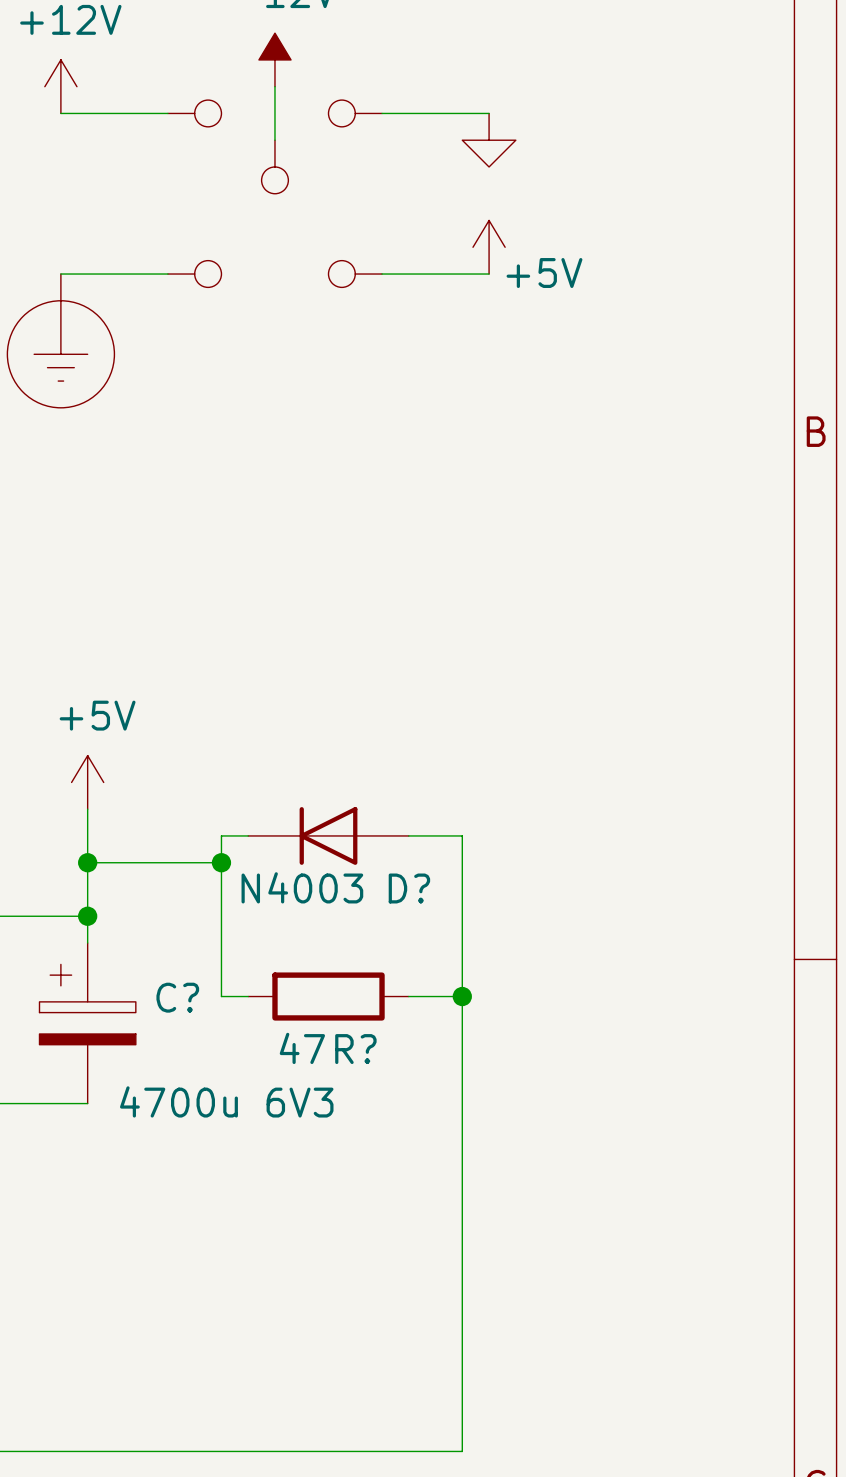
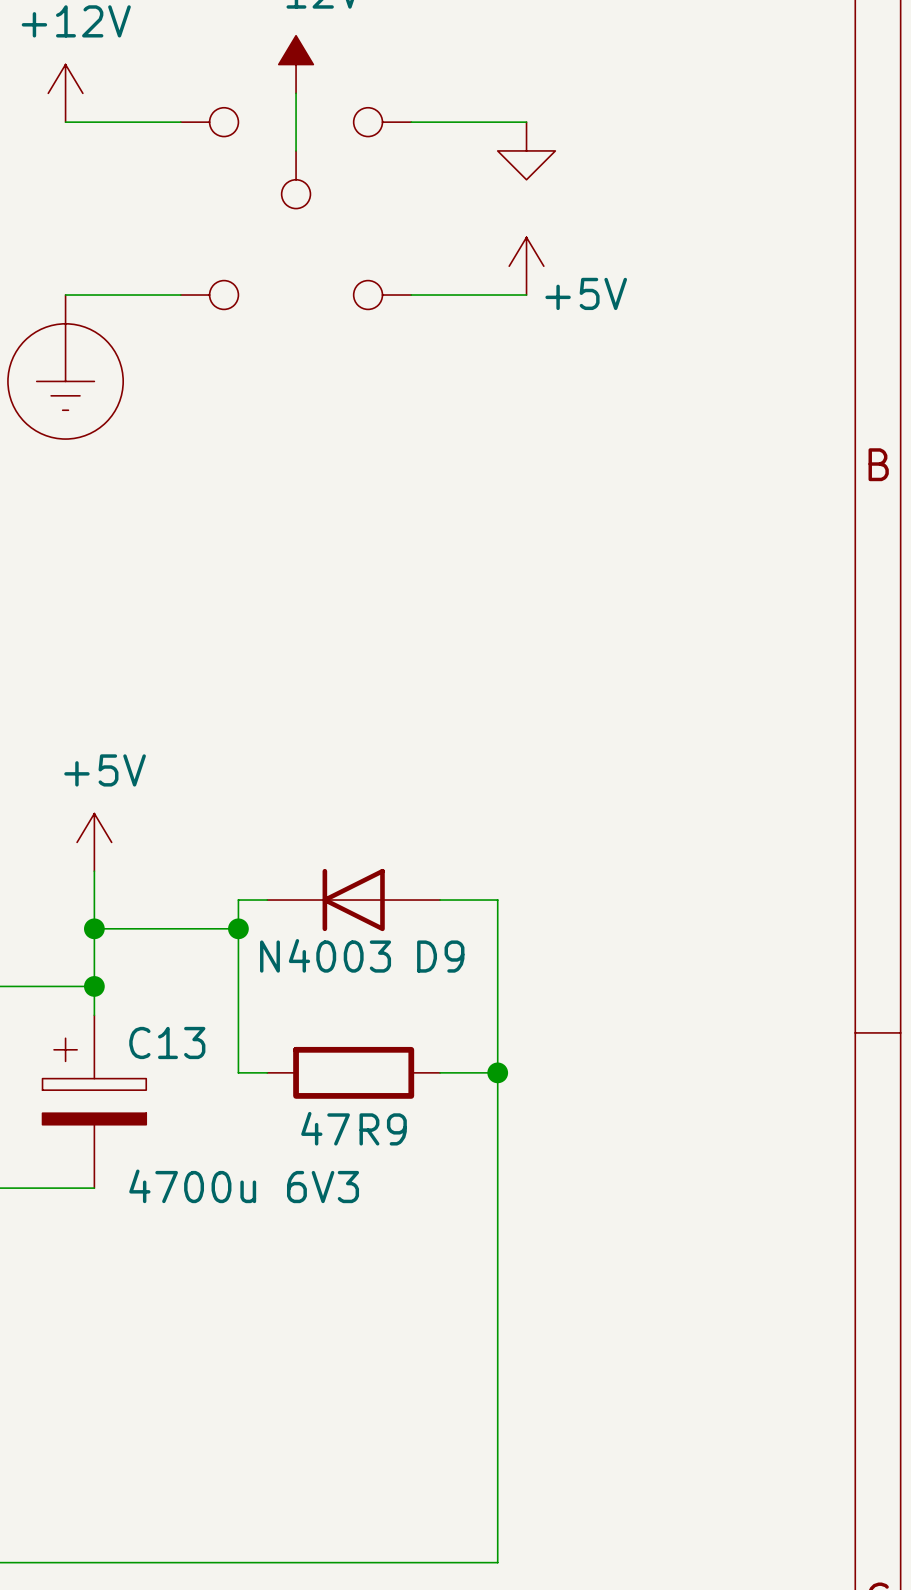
D? name: D? (409, 888) -> D9 (440, 956)
C? name: C? (177, 997) -> C13 (167, 1042)
R? name: R? (355, 1049) -> R9 (383, 1129)

